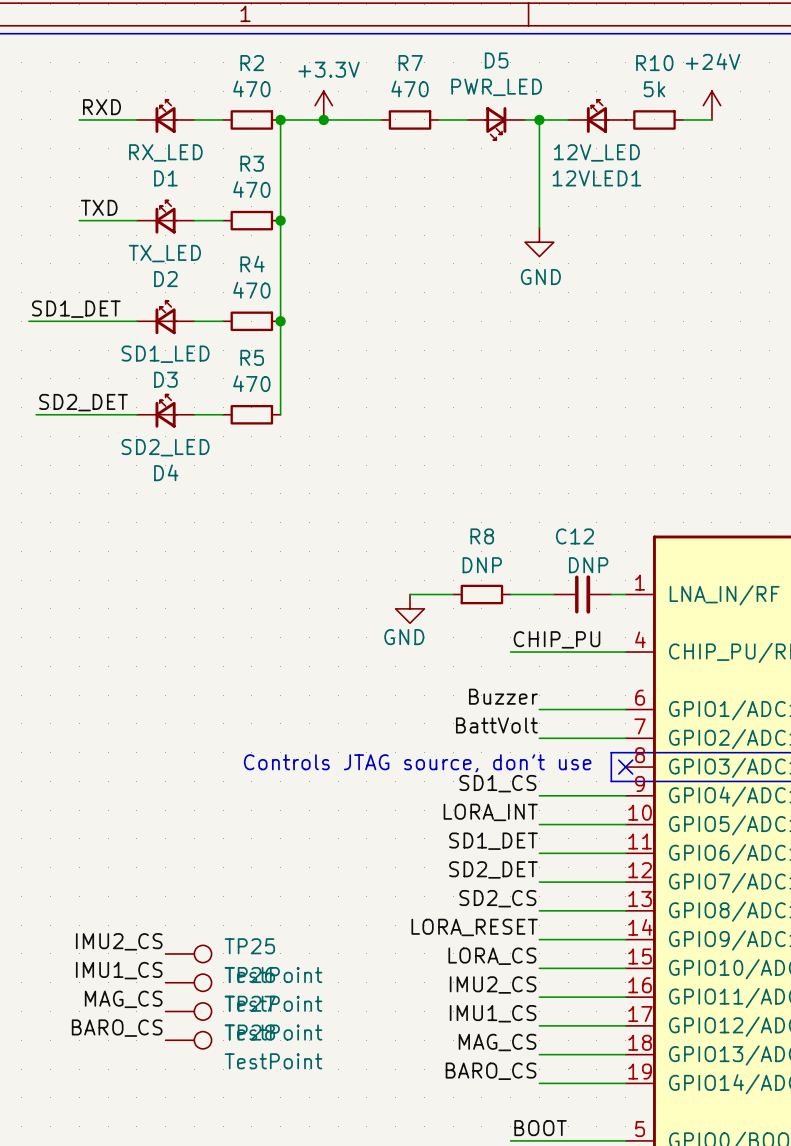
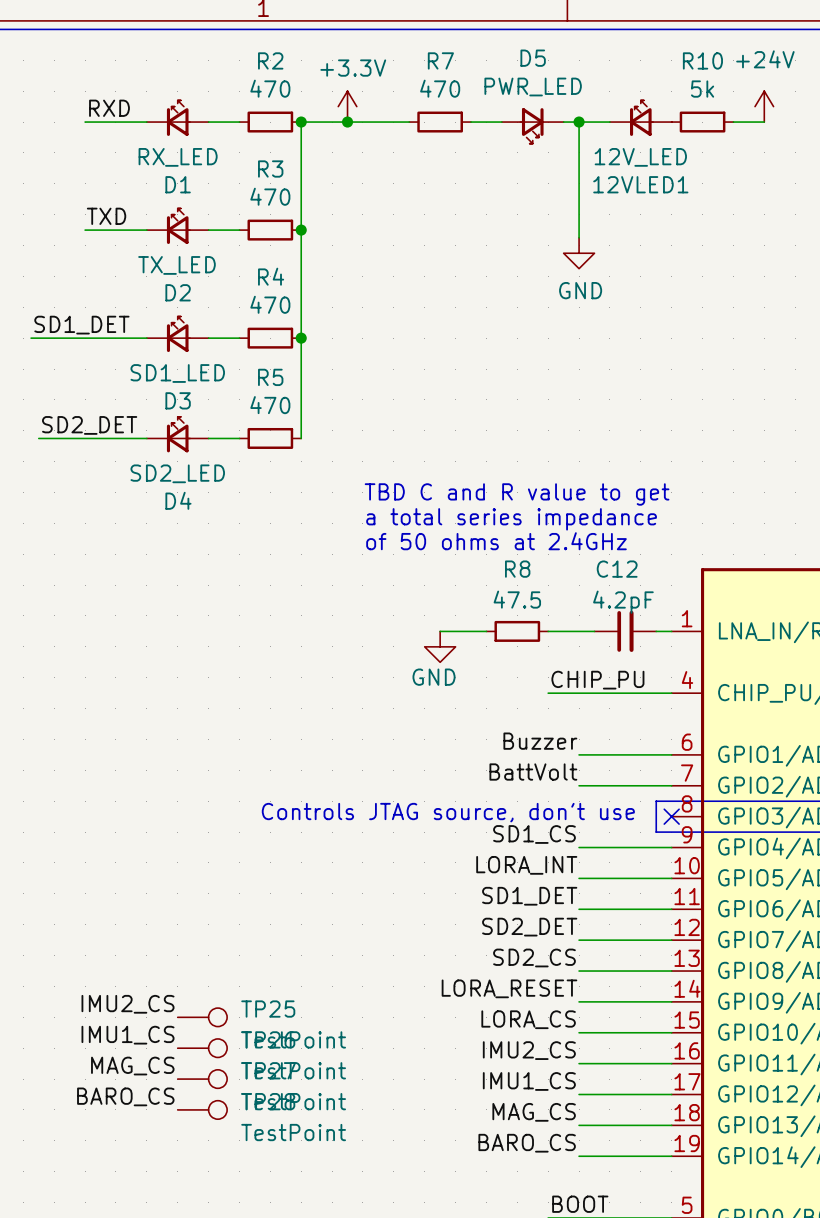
text: none -> TBD C and R value to get (517, 494)
text: none -> a total series impedance (511, 519)
text: none -> of 50 ohms at 2.4GHz (496, 541)
R8 value: DNP (482, 565) -> 47.5 (517, 599)
C12 value: DNP (588, 565) -> 4.2pF (623, 602)

